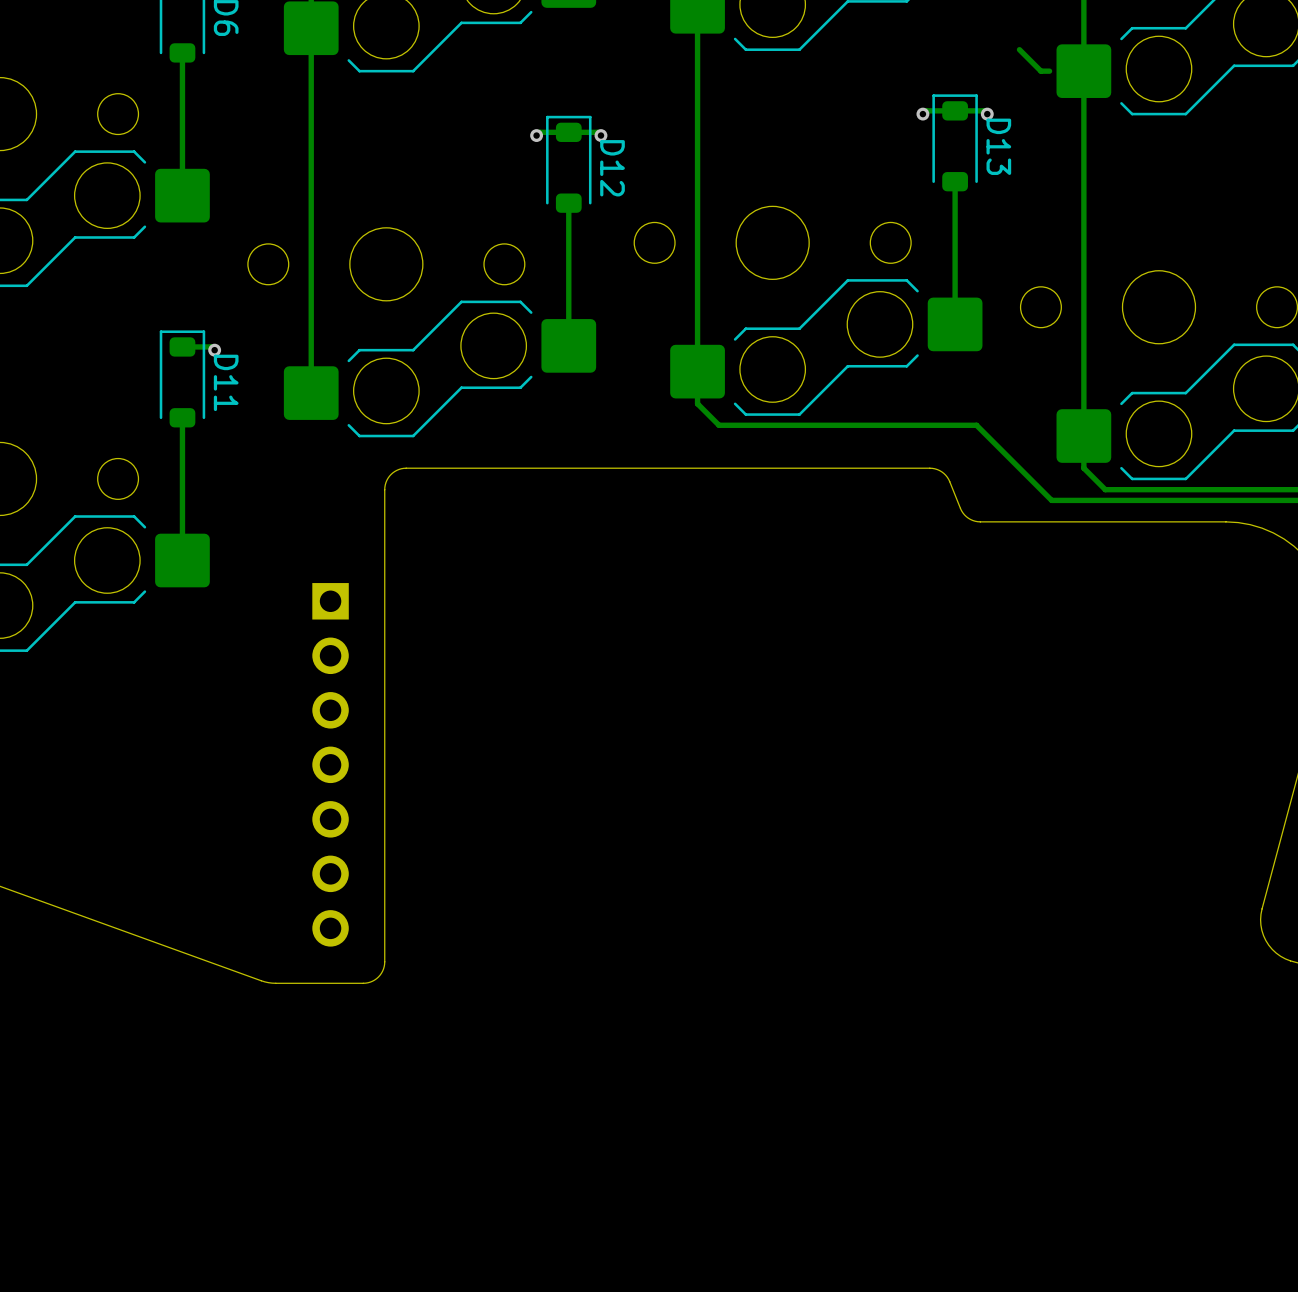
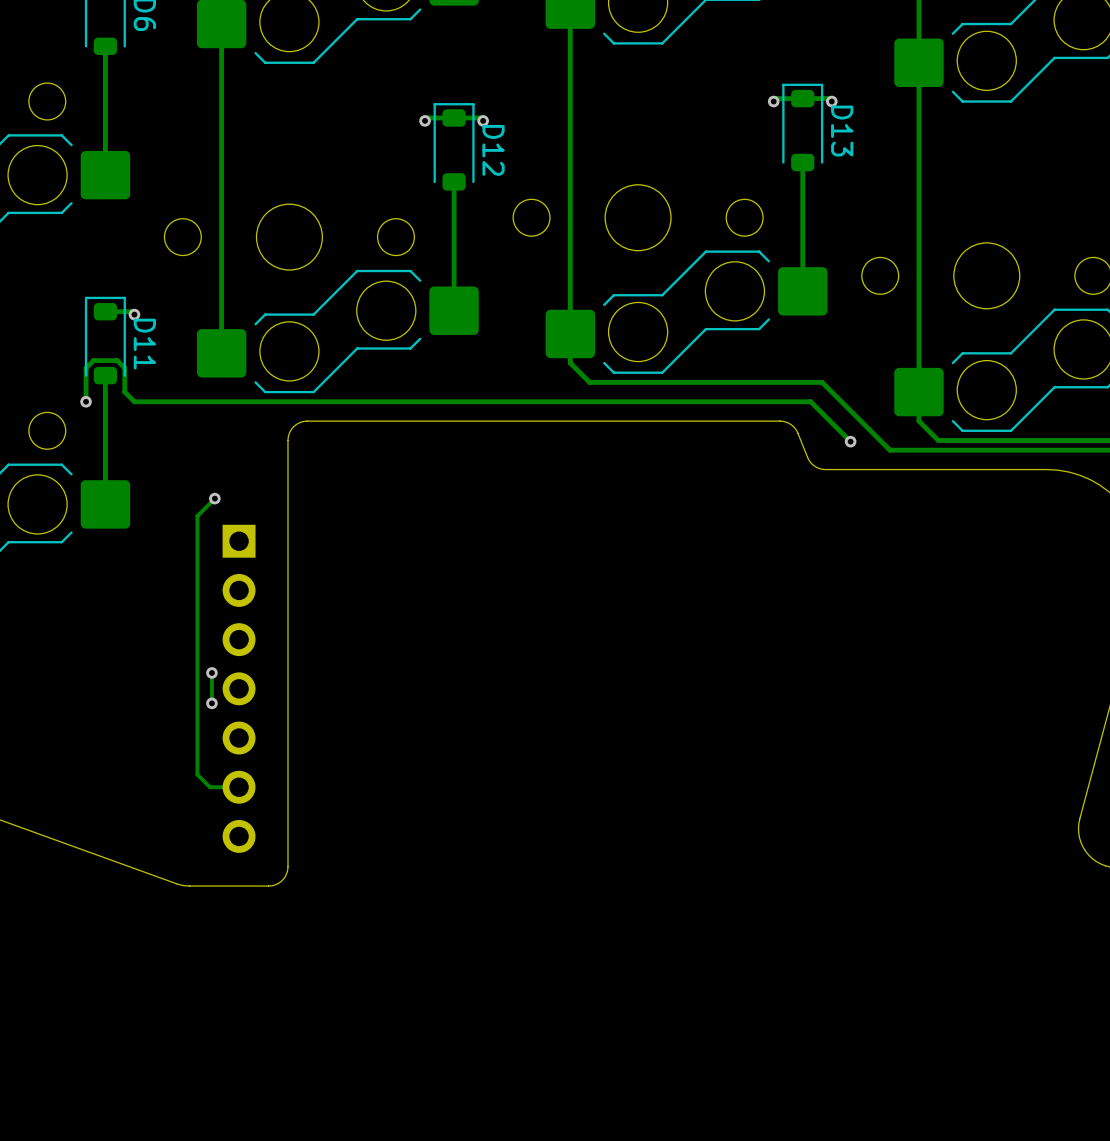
track: (1019, 49) (1040, 71) (1049, 71) -> none
track: none -> (86, 401) (86, 368) (93, 360) (117, 360) (124, 368) (124, 392) (134, 401) (810, 401) (850, 441)
via: none -> (86, 401)
via: none -> (850, 441)
track: none -> (214, 498) (197, 516) (197, 774) (210, 787) (239, 787)
via: none -> (214, 498)
track: none -> (211, 672) (211, 703)
via: none -> (211, 672)
via: none -> (211, 703)

